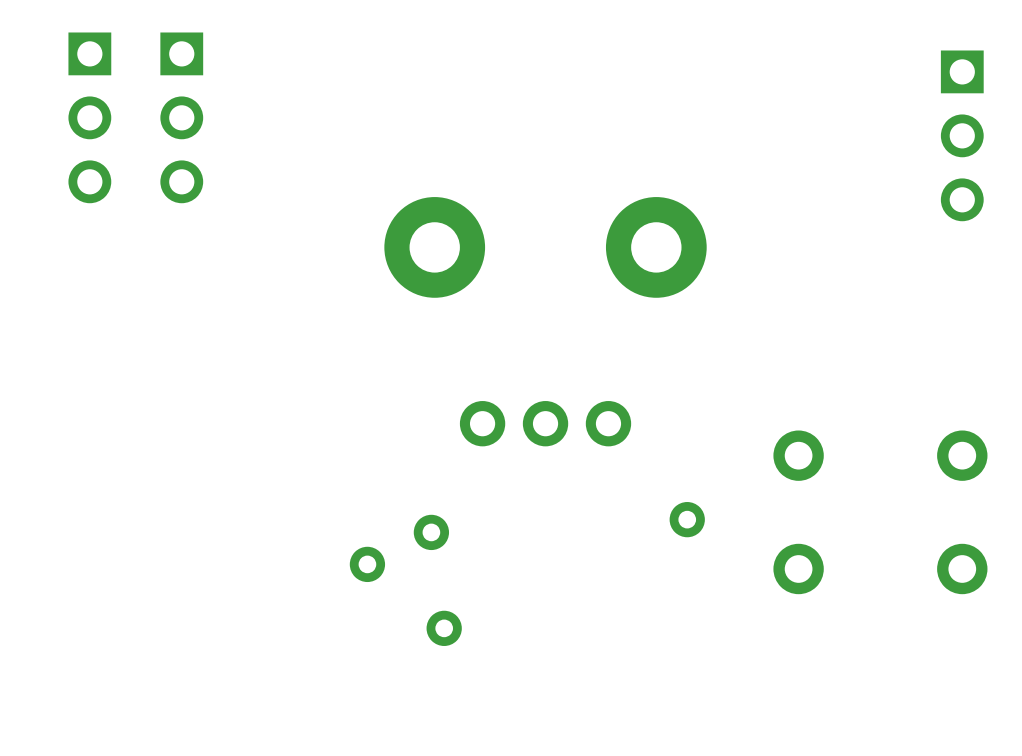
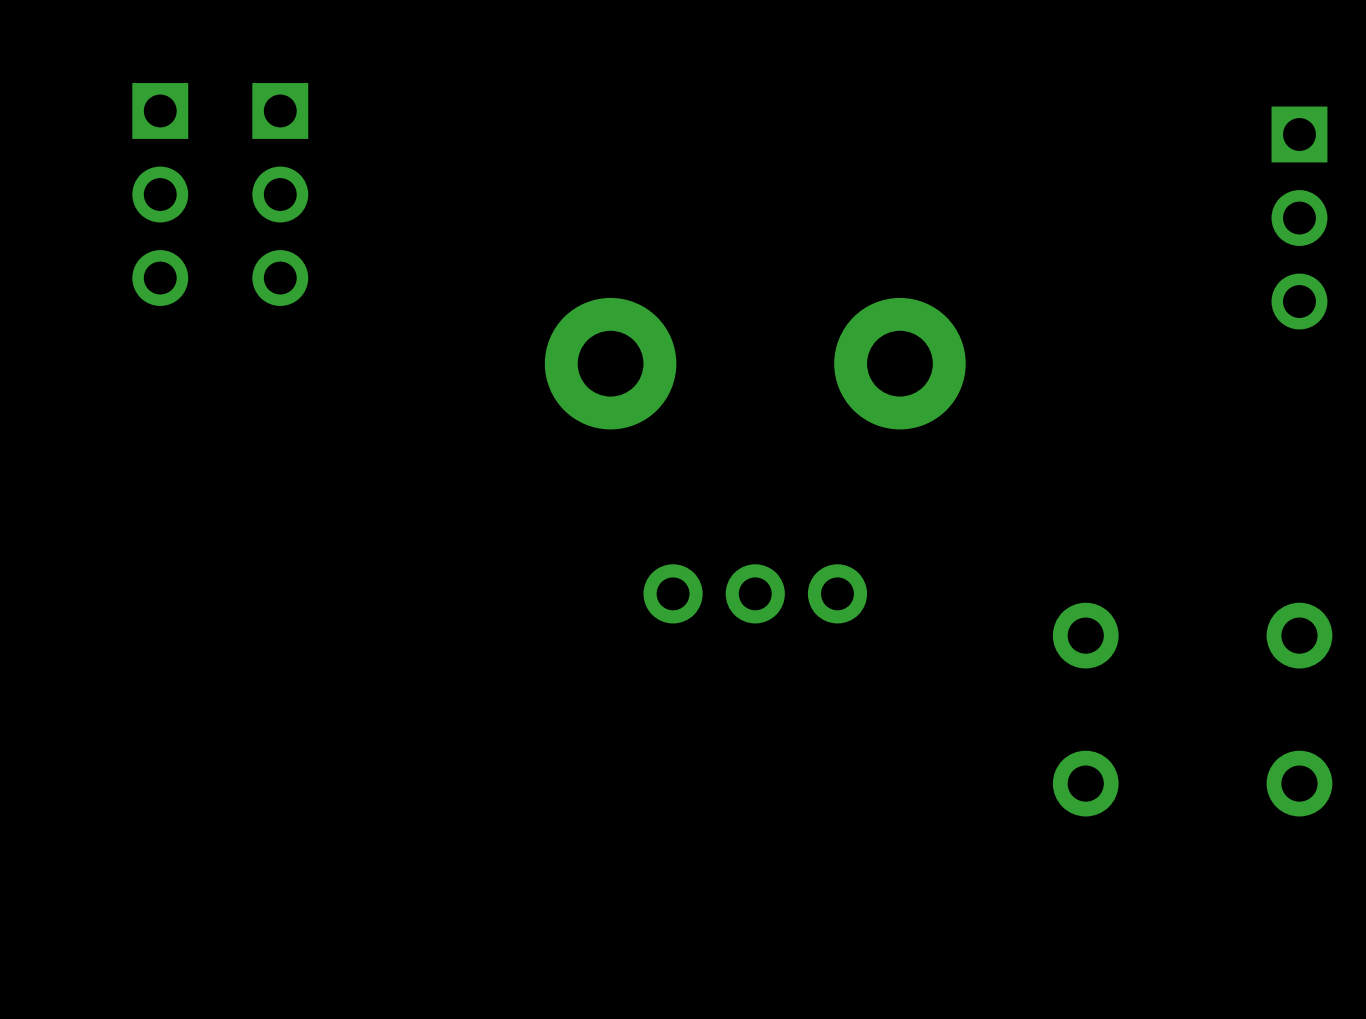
part: (687, 519) -> none
part: (431, 532) -> none
part: (367, 564) -> none
part: (444, 628) -> none

